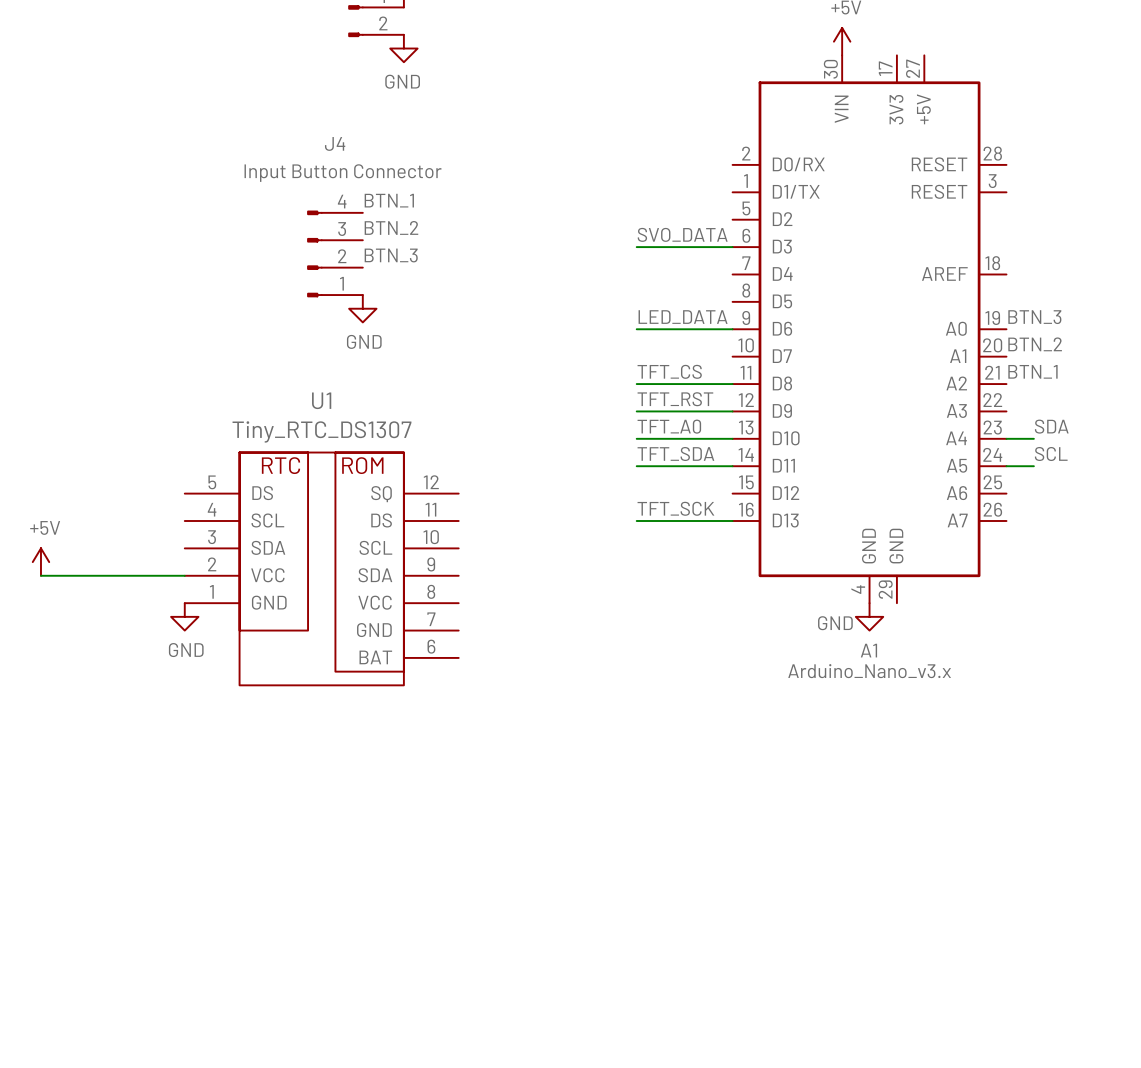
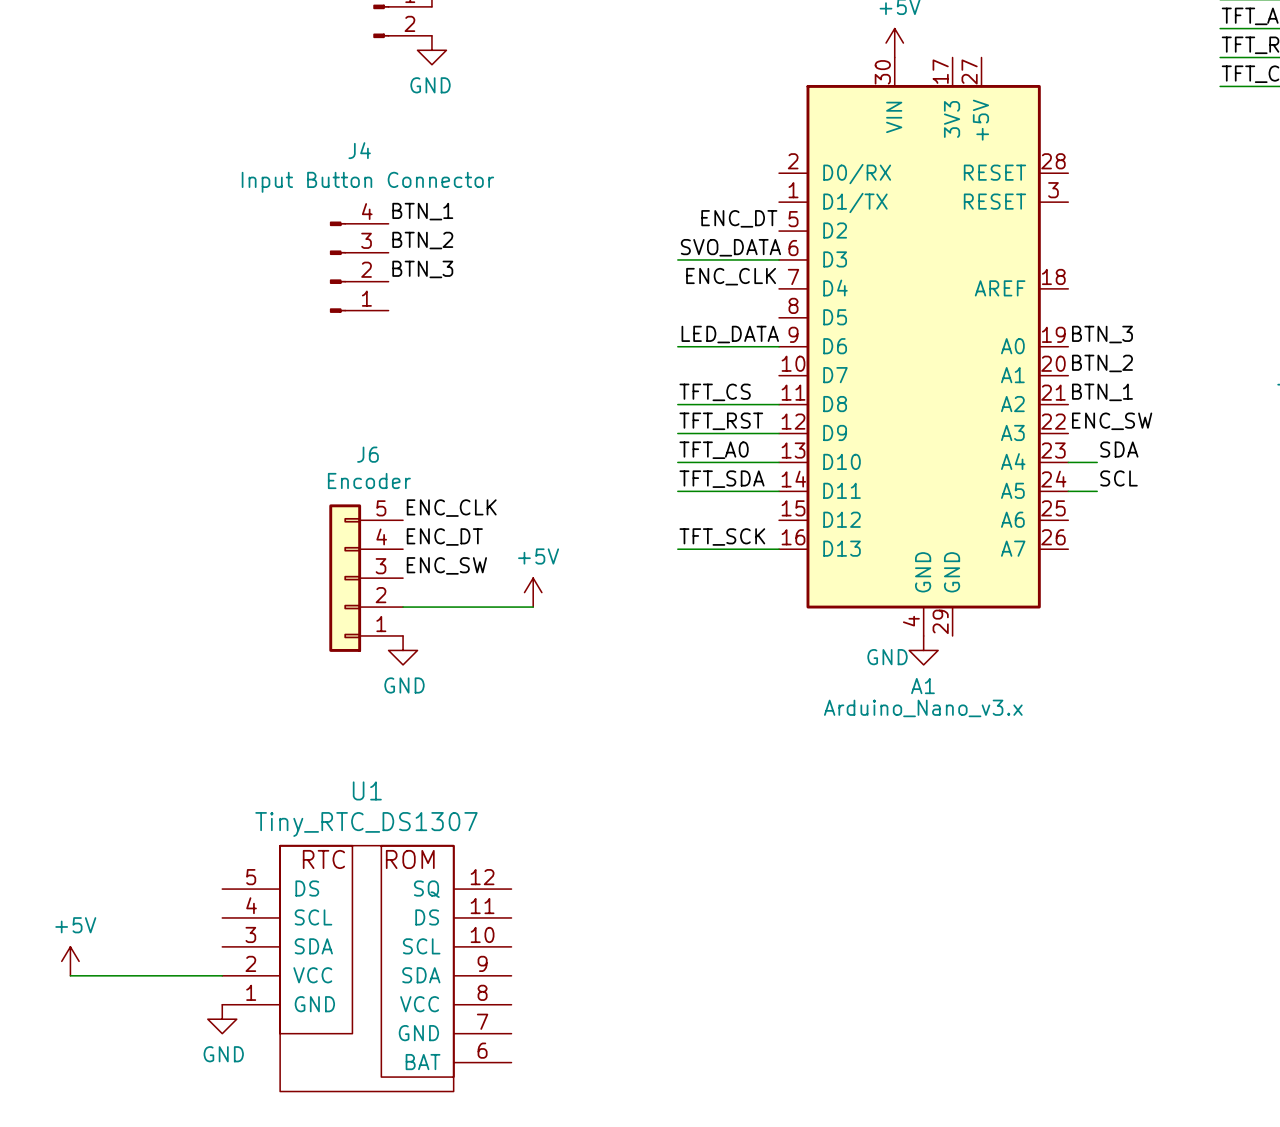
label: none -> ENC_DT (739, 218)
label: none -> ENC_CLK (731, 276)
power symbol: GND (362, 308) -> none
label: none -> ENC_SW (1112, 421)
label: none -> ENC_CLK (451, 508)
label: none -> ENC_DT (444, 536)
label: none -> ENC_SW (446, 565)
J6: none -> Encoder (366, 578)
power symbol: +5V (40, 562) -> none
power symbol: none -> +5V (533, 592)
U1 position: (321, 568) -> (366, 968)
wire: (40, 575) (184, 575) -> none
wire: none -> (403, 607) (533, 607)
power symbol: GND (184, 616) -> none
power symbol: none -> GND (403, 650)
power symbol: none -> +5V (70, 961)
wire: none -> (70, 975) (222, 975)
power symbol: none -> GND (222, 1019)

